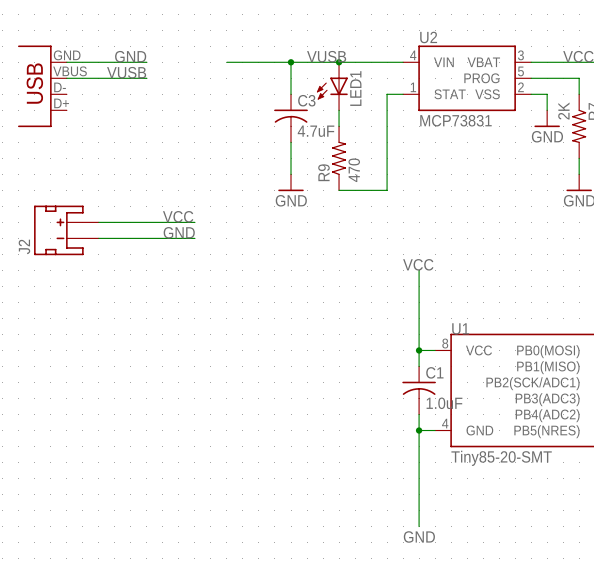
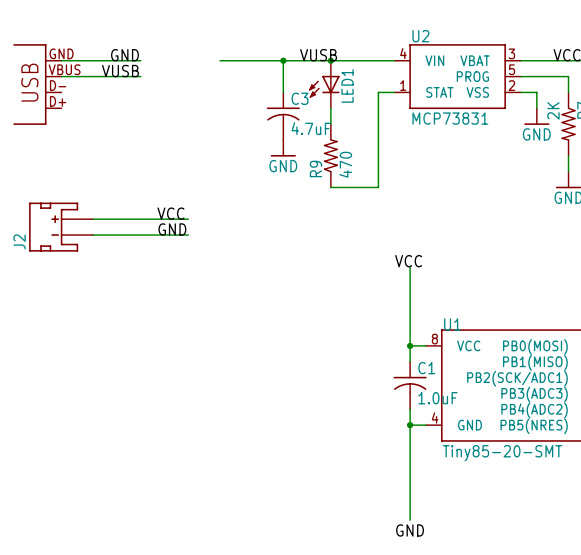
power symbol position: GND (291, 182) -> GND (283, 148)

